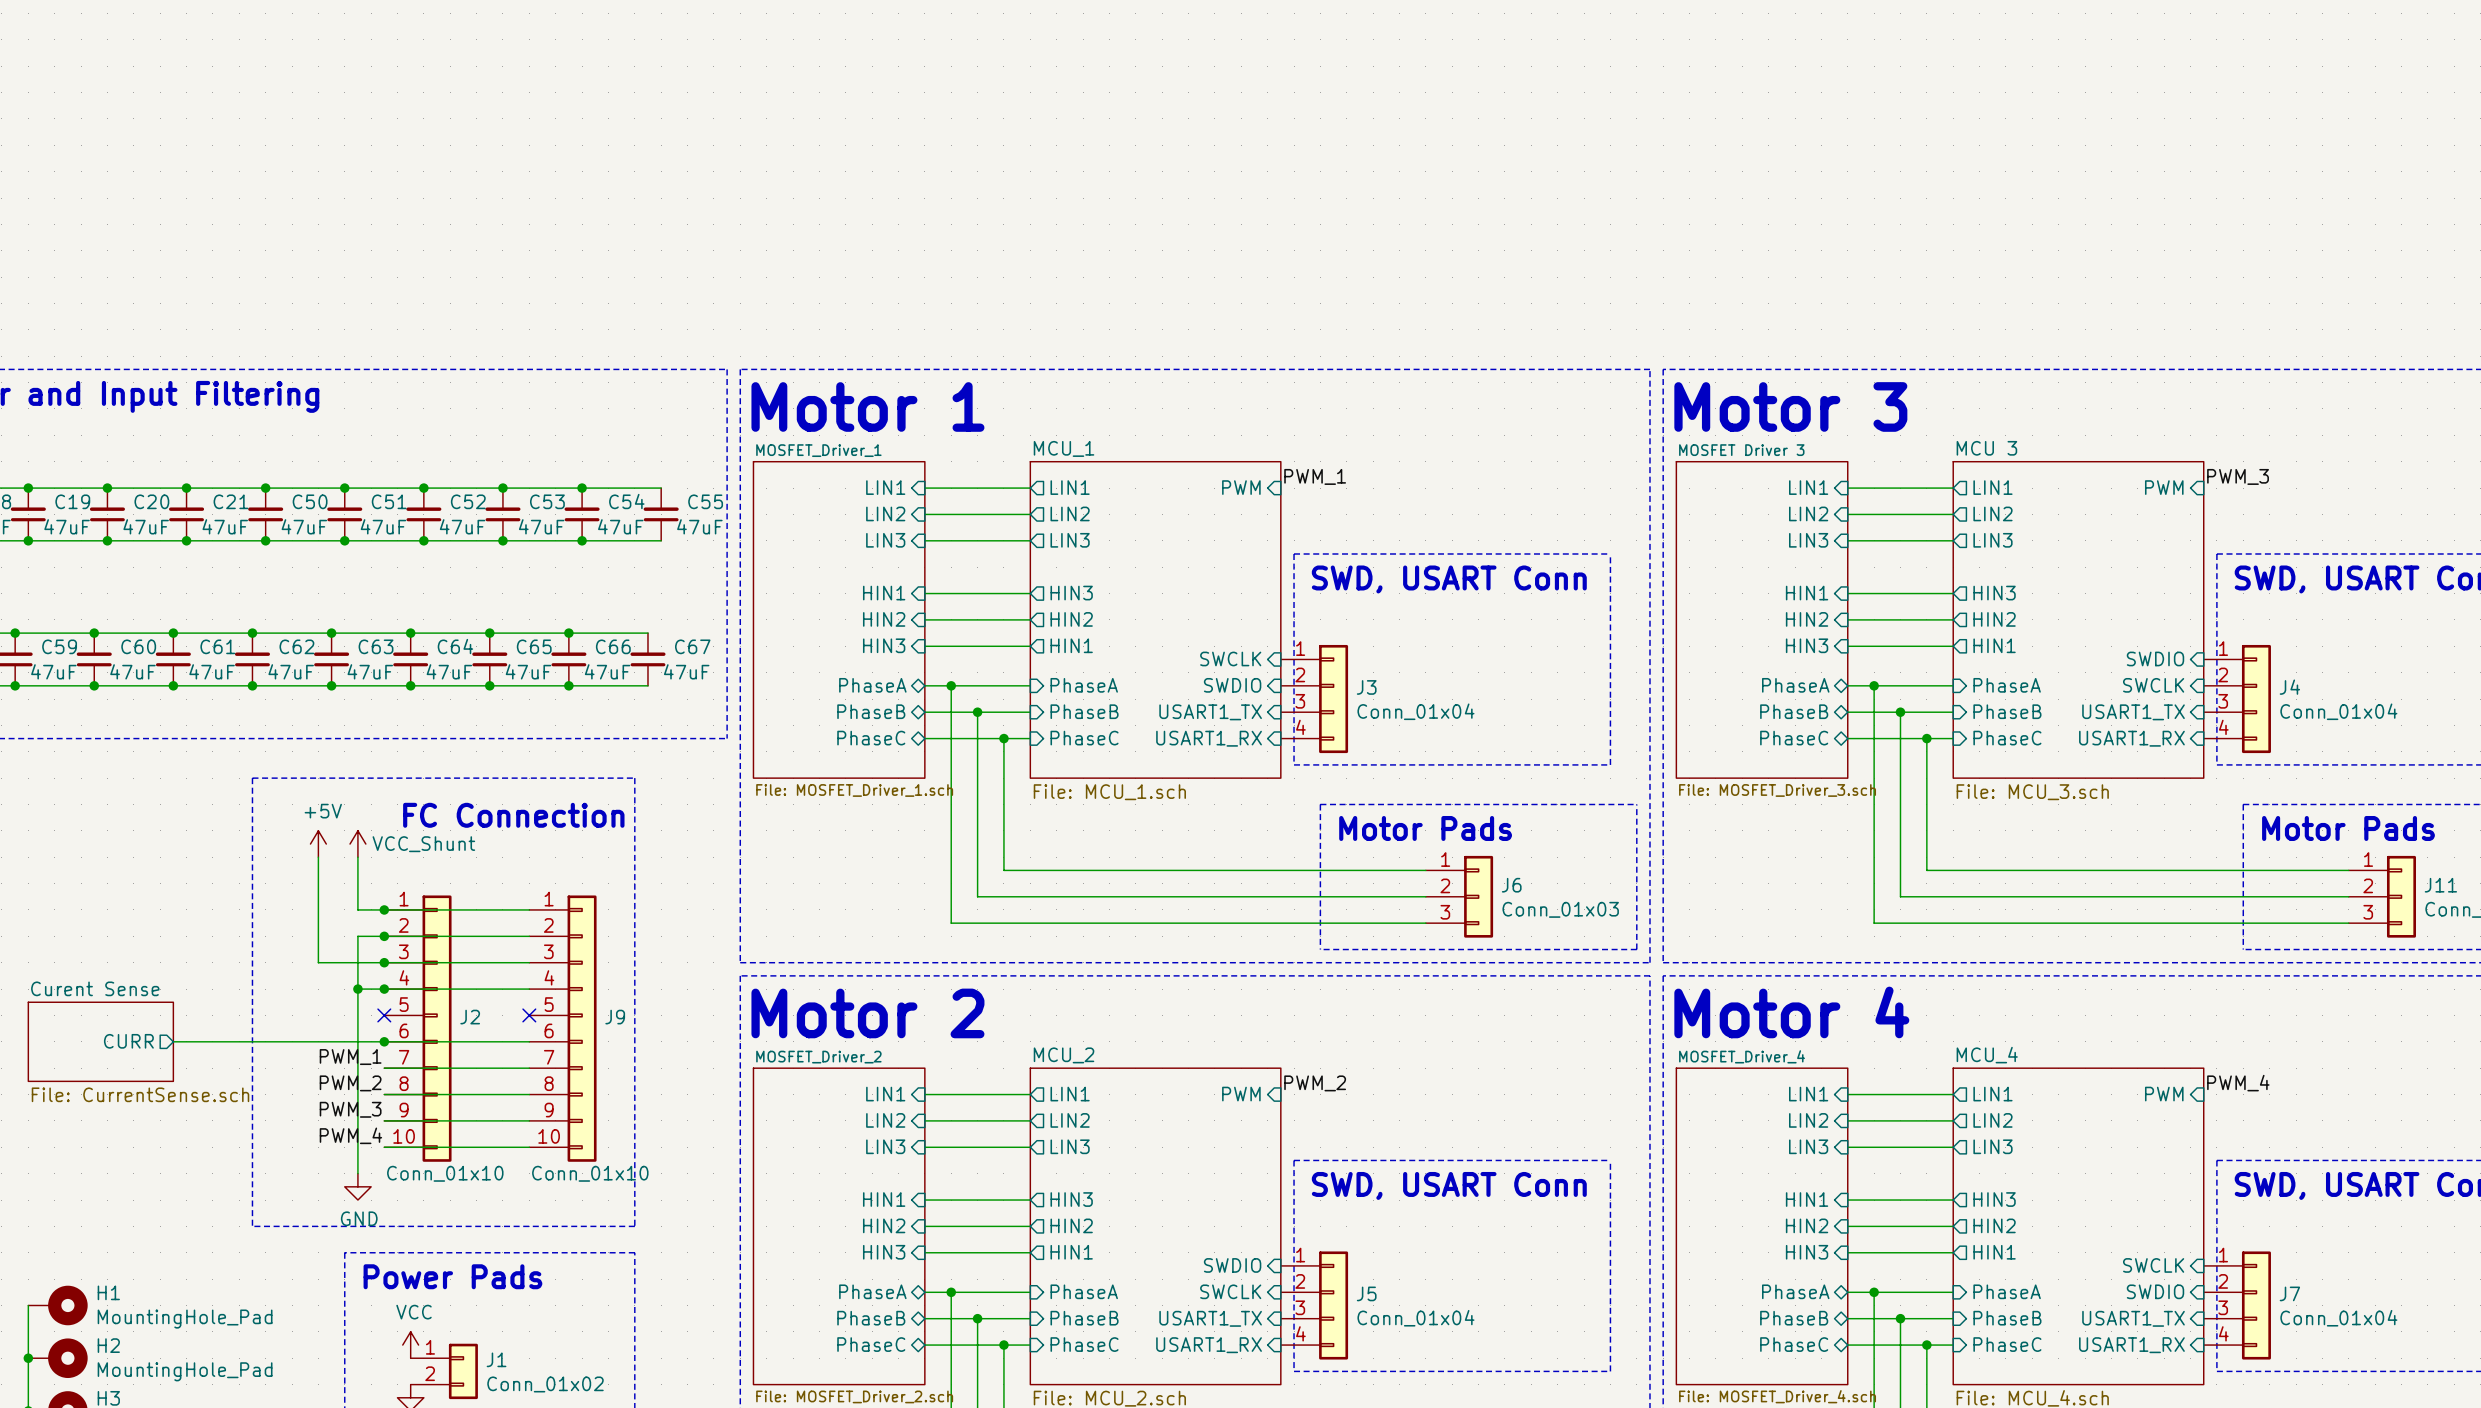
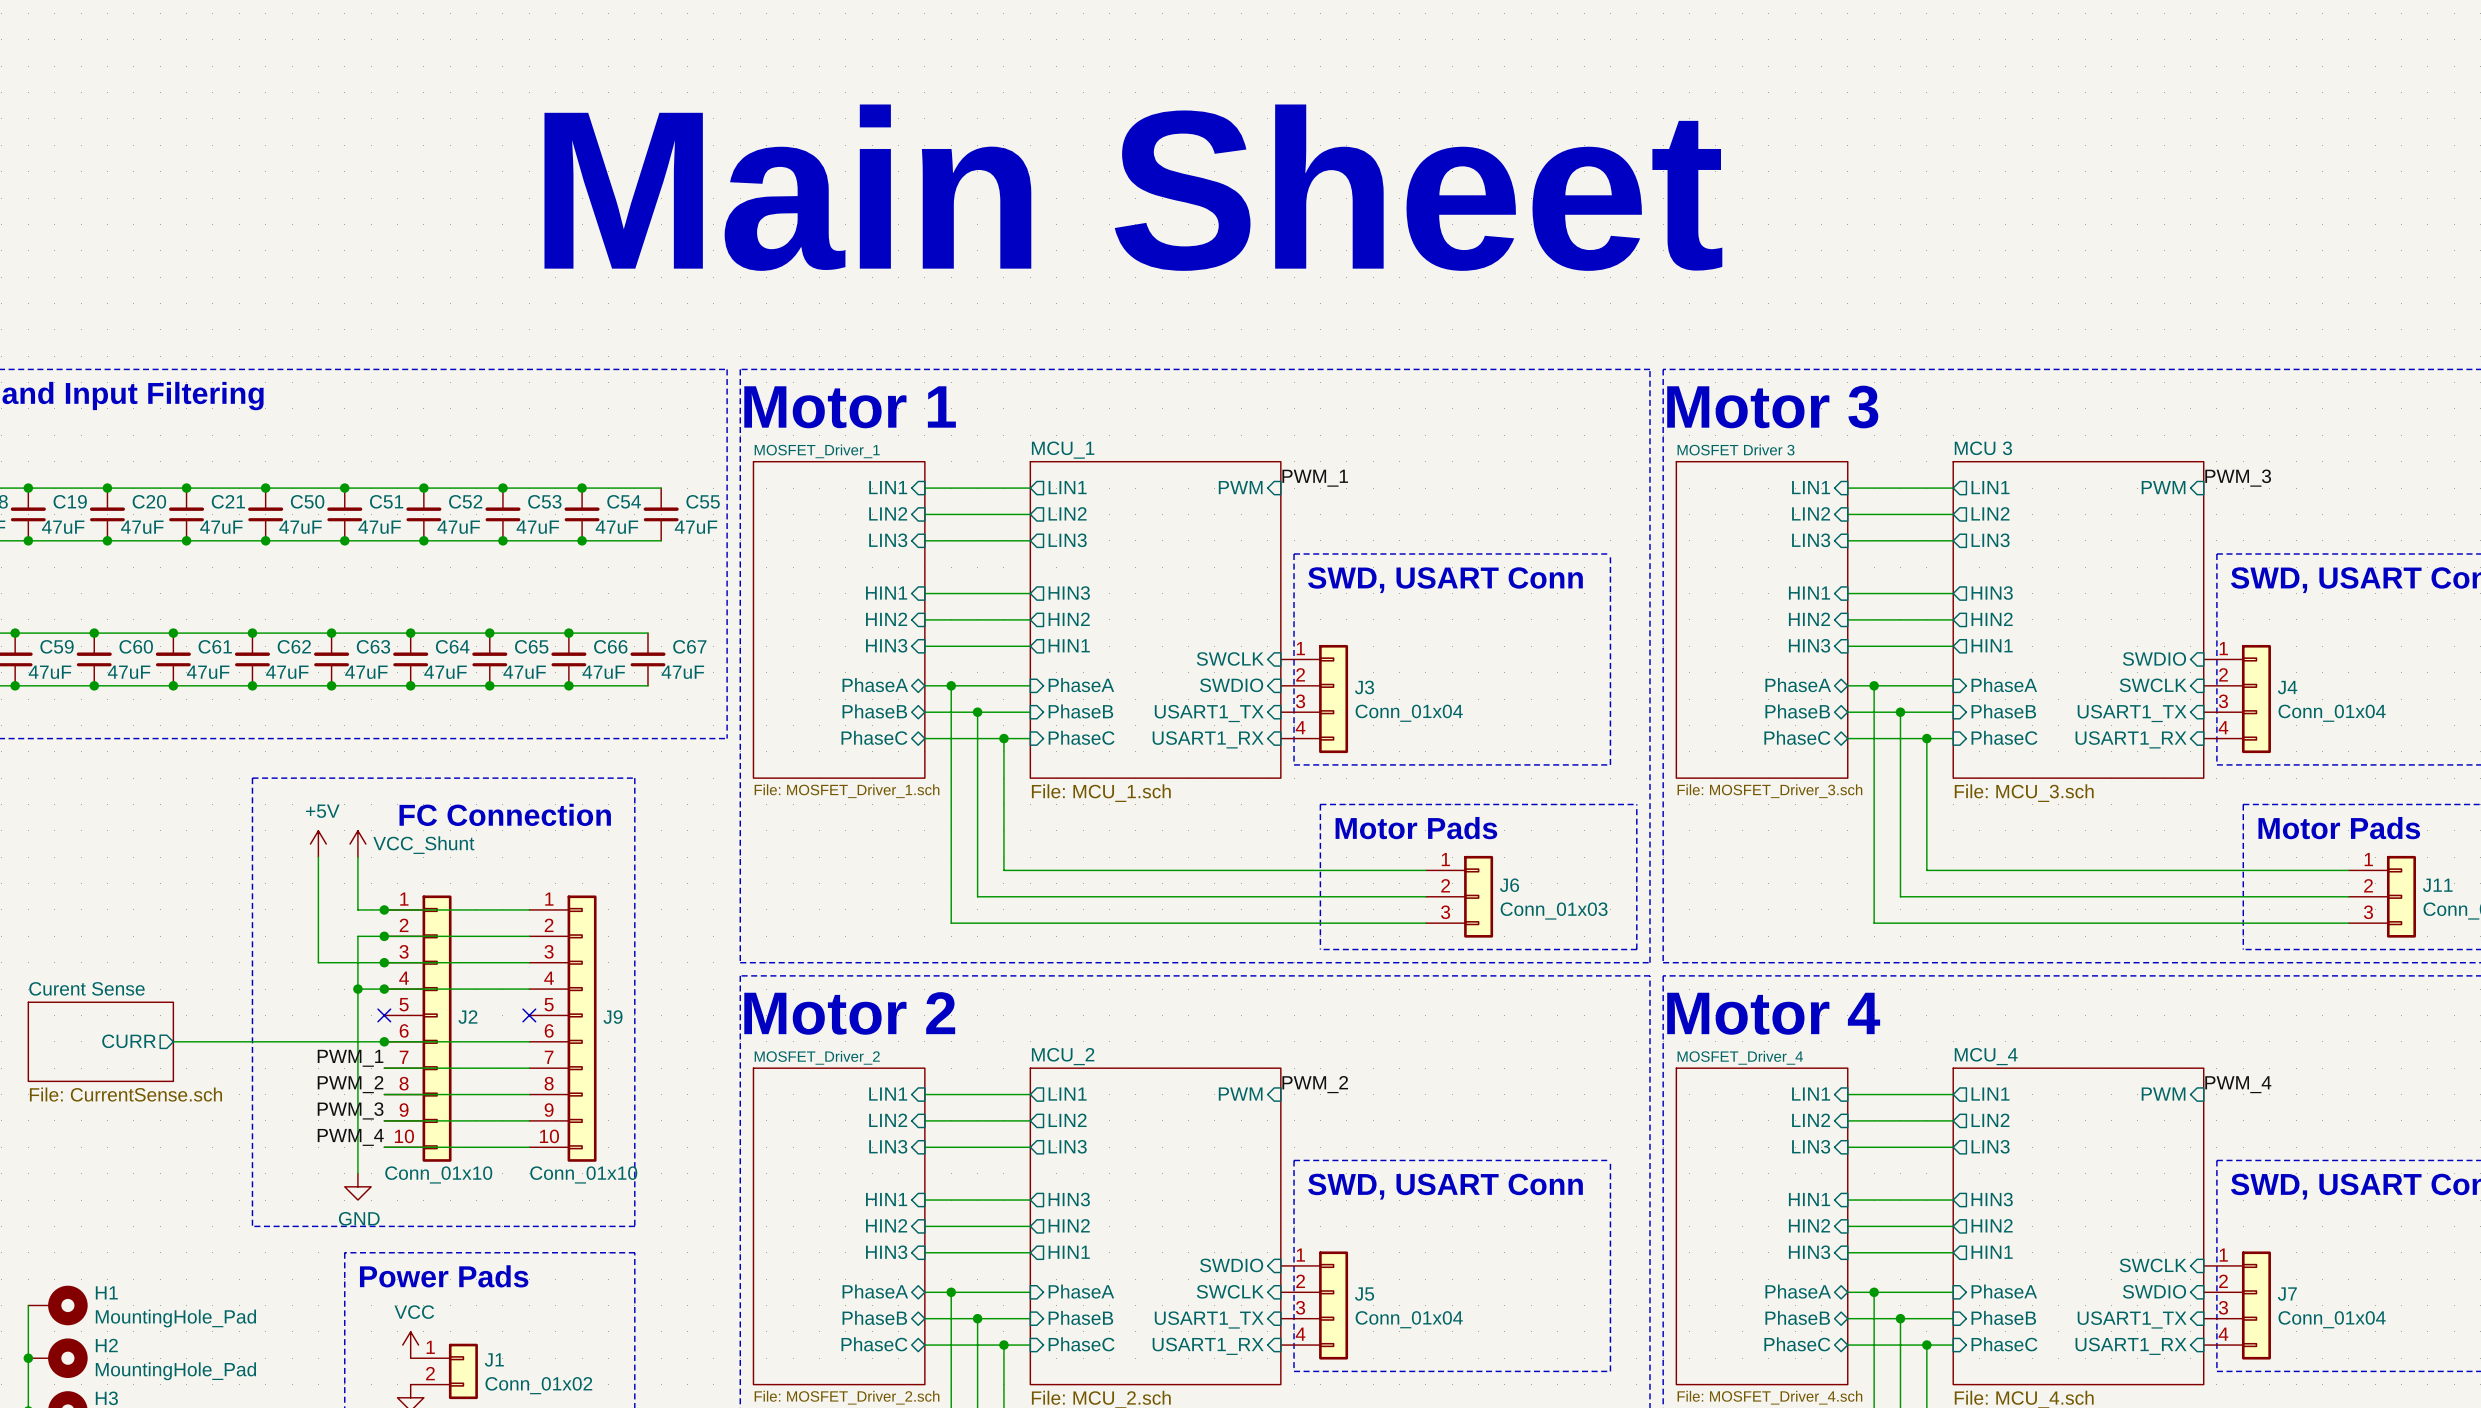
text: none -> Main Sheet (1133, 187)

